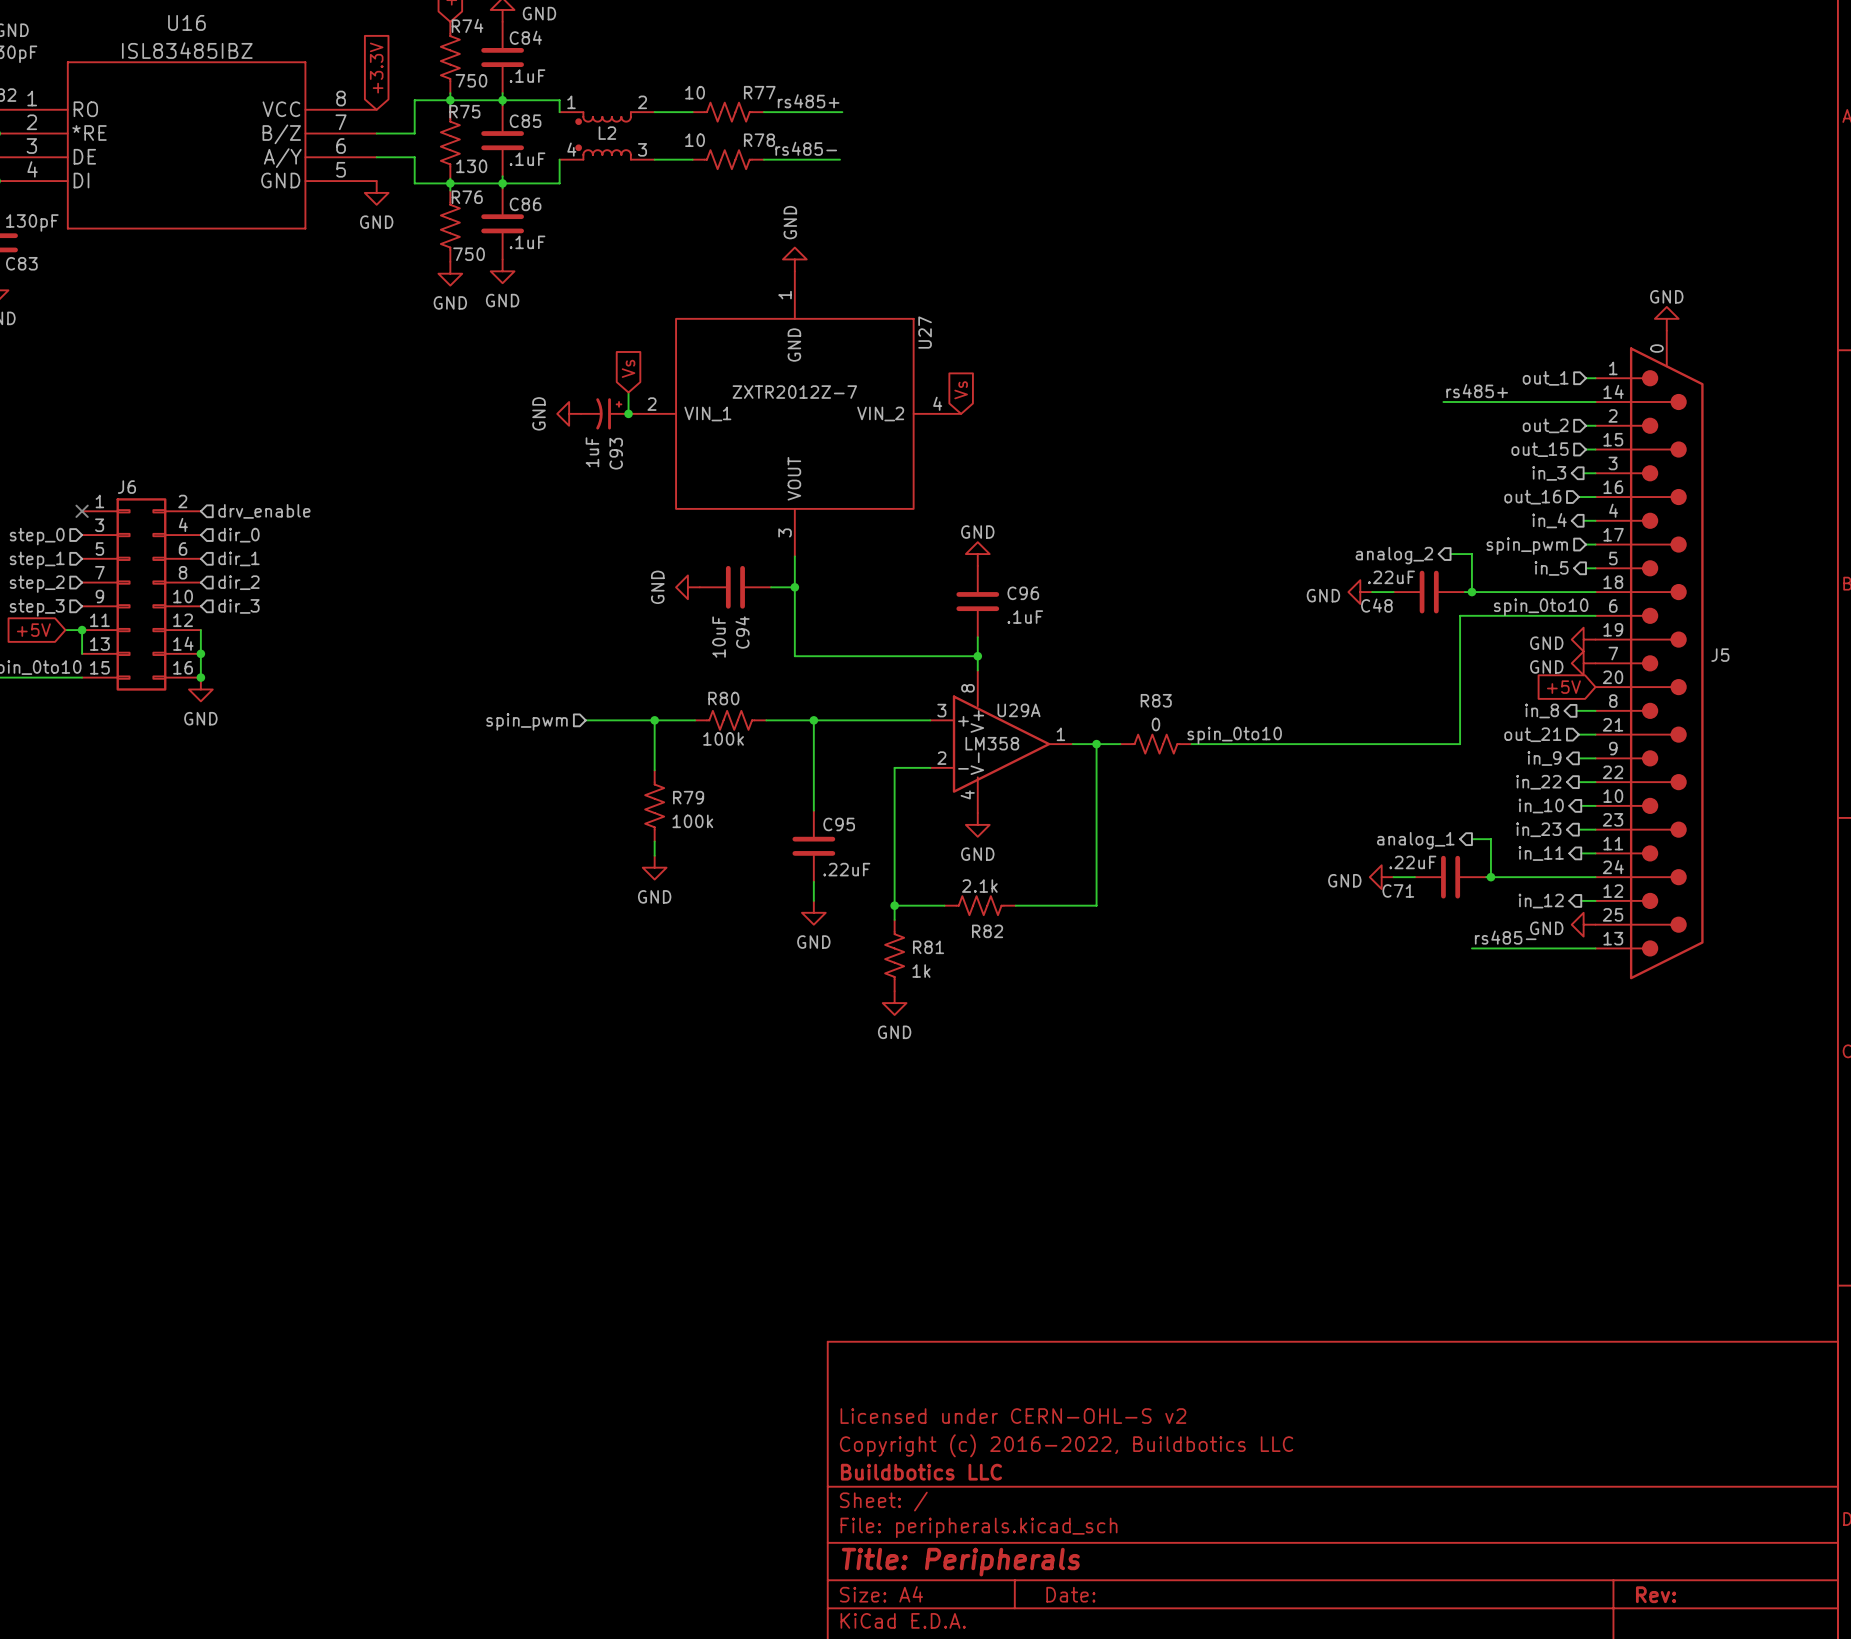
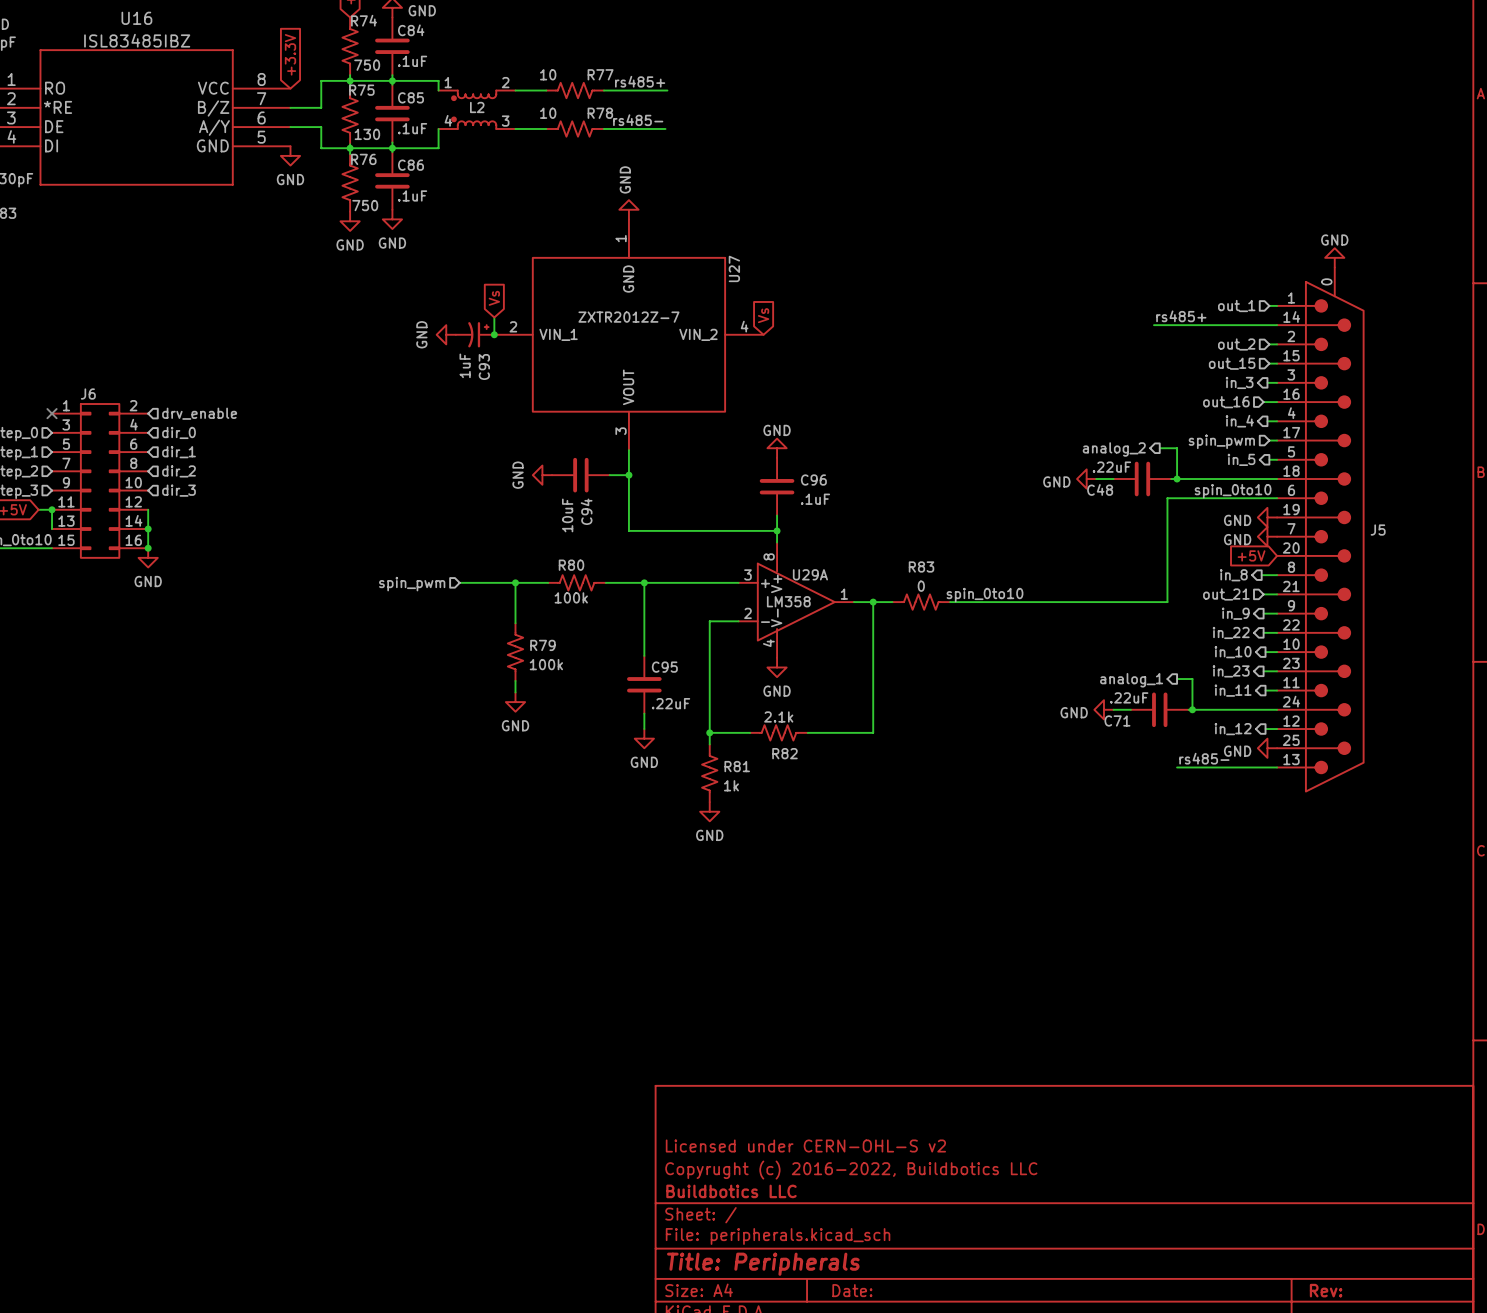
title block: Copyright (c) 2016-2022, Buildbotics LLC (1066, 1445) -> Copyrught (c) 2016-2022, Buildbotics LLC (851, 1170)

